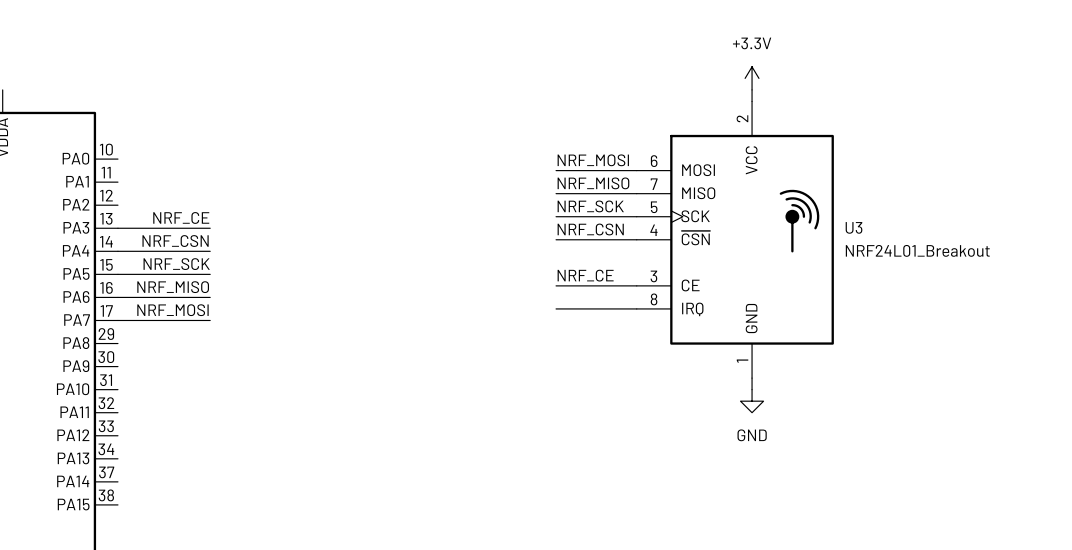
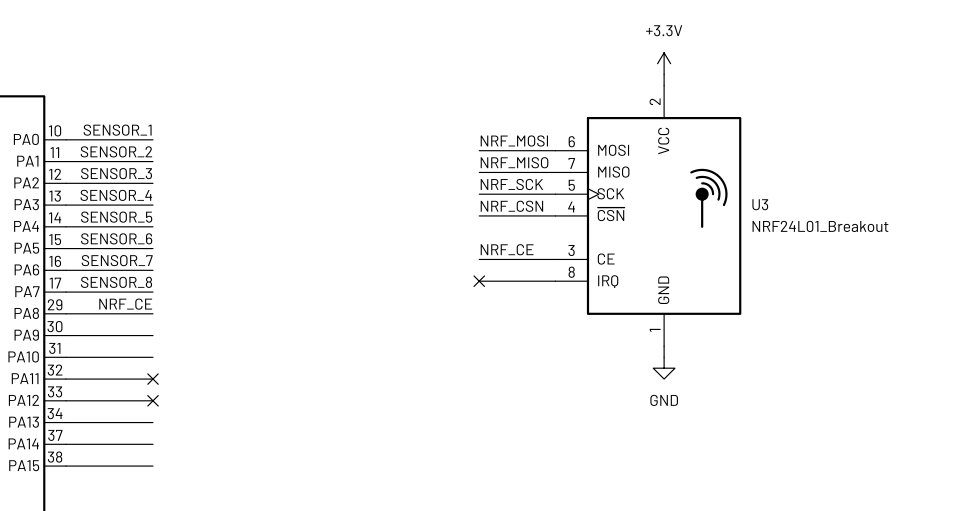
label: none -> SENSOR_1 (117, 130)
wire: none -> (66, 139) (153, 139)
label: none -> SENSOR_2 (116, 151)
wire: none -> (66, 161) (153, 161)
label: none -> SENSOR_3 (116, 173)
wire: none -> (66, 183) (153, 183)
label: NRF_CE (181, 217) -> SENSOR_4 (116, 195)
label: NRF_CSN (175, 241) -> SENSOR_5 (116, 217)
label: NRF_SCK (176, 264) -> SENSOR_6 (116, 238)
label: NRF_MISO (173, 287) -> SENSOR_7 (117, 260)
no-connect mark: none -> (479, 281)
label: NRF_MOSI (172, 310) -> SENSOR_8 (116, 282)
label: none -> NRF_CE (125, 304)
wire: none -> (66, 313) (153, 313)
wire: none -> (66, 335) (153, 335)
wire: none -> (66, 357) (153, 357)
wire: none -> (66, 379) (153, 379)
no-connect mark: none -> (153, 379)
wire: none -> (66, 400) (153, 400)
no-connect mark: none -> (153, 400)
wire: none -> (66, 422) (153, 422)
wire: none -> (66, 444) (153, 444)
wire: none -> (66, 466) (153, 466)

